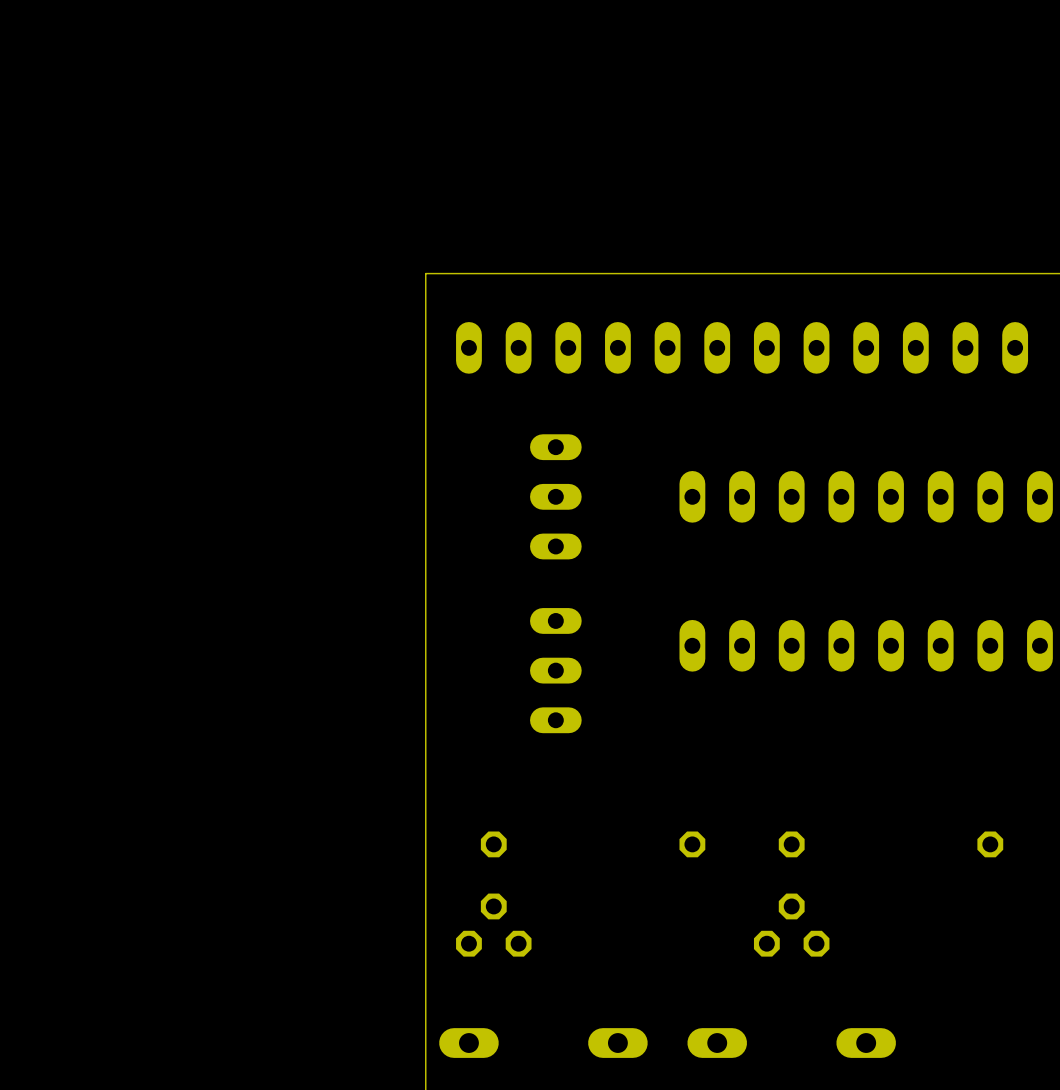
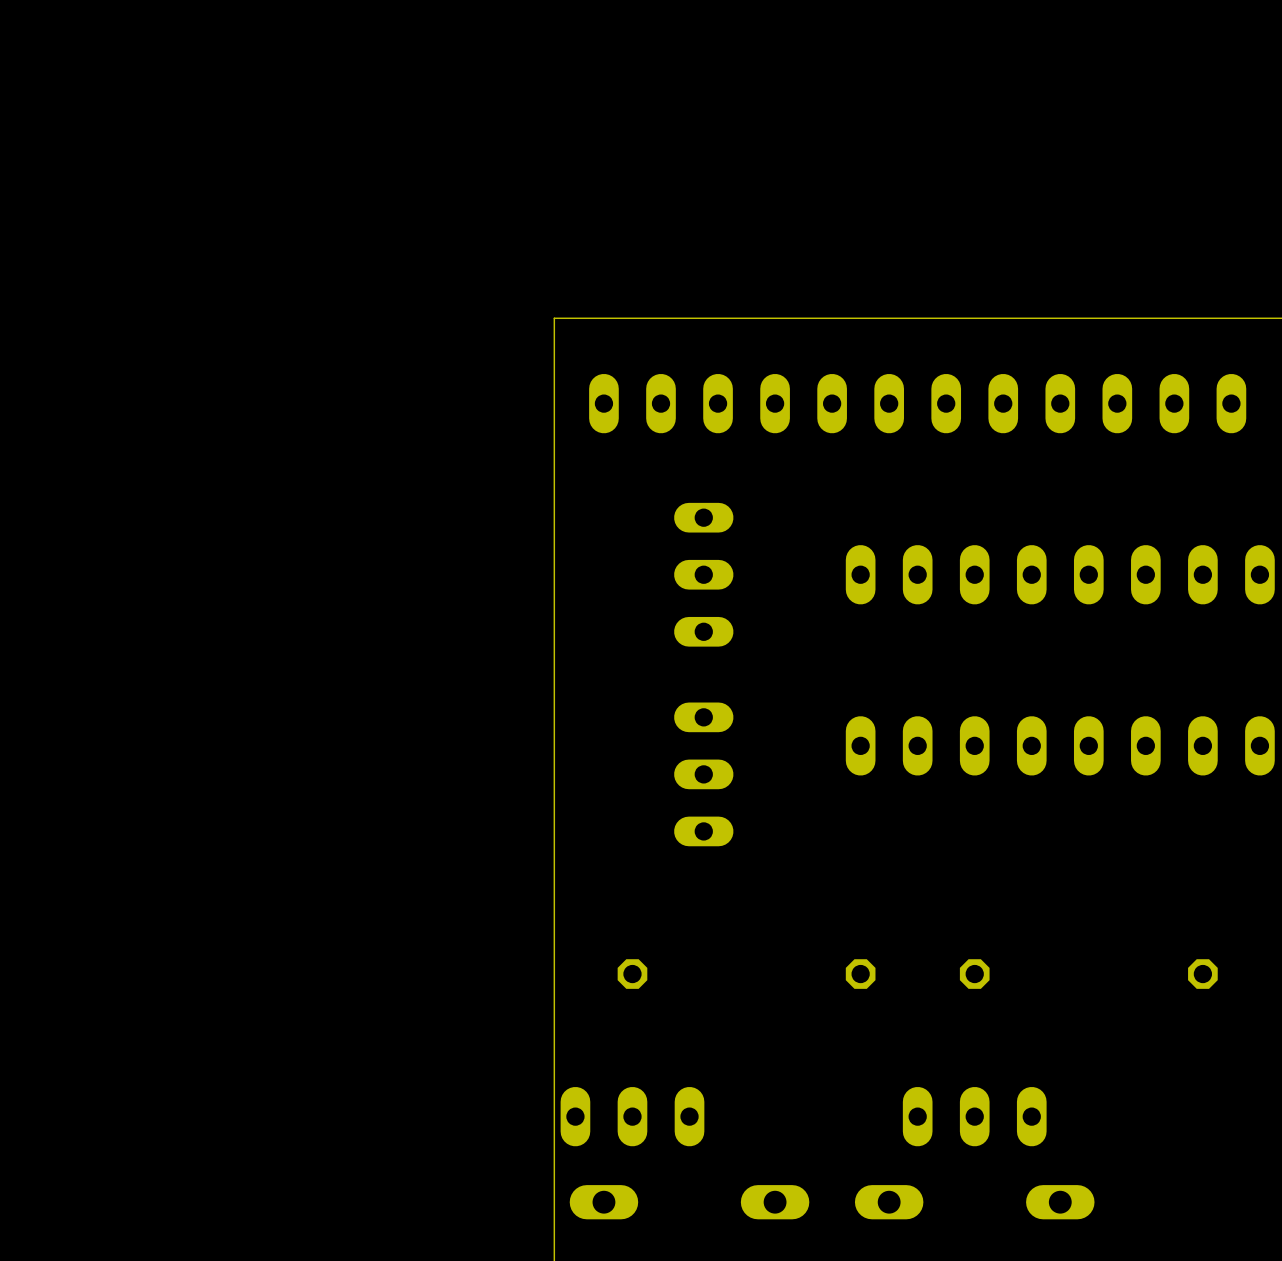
part: (493, 925) -> none
part: (791, 925) -> none
part: none -> (632, 1116)
part: none -> (974, 1116)

